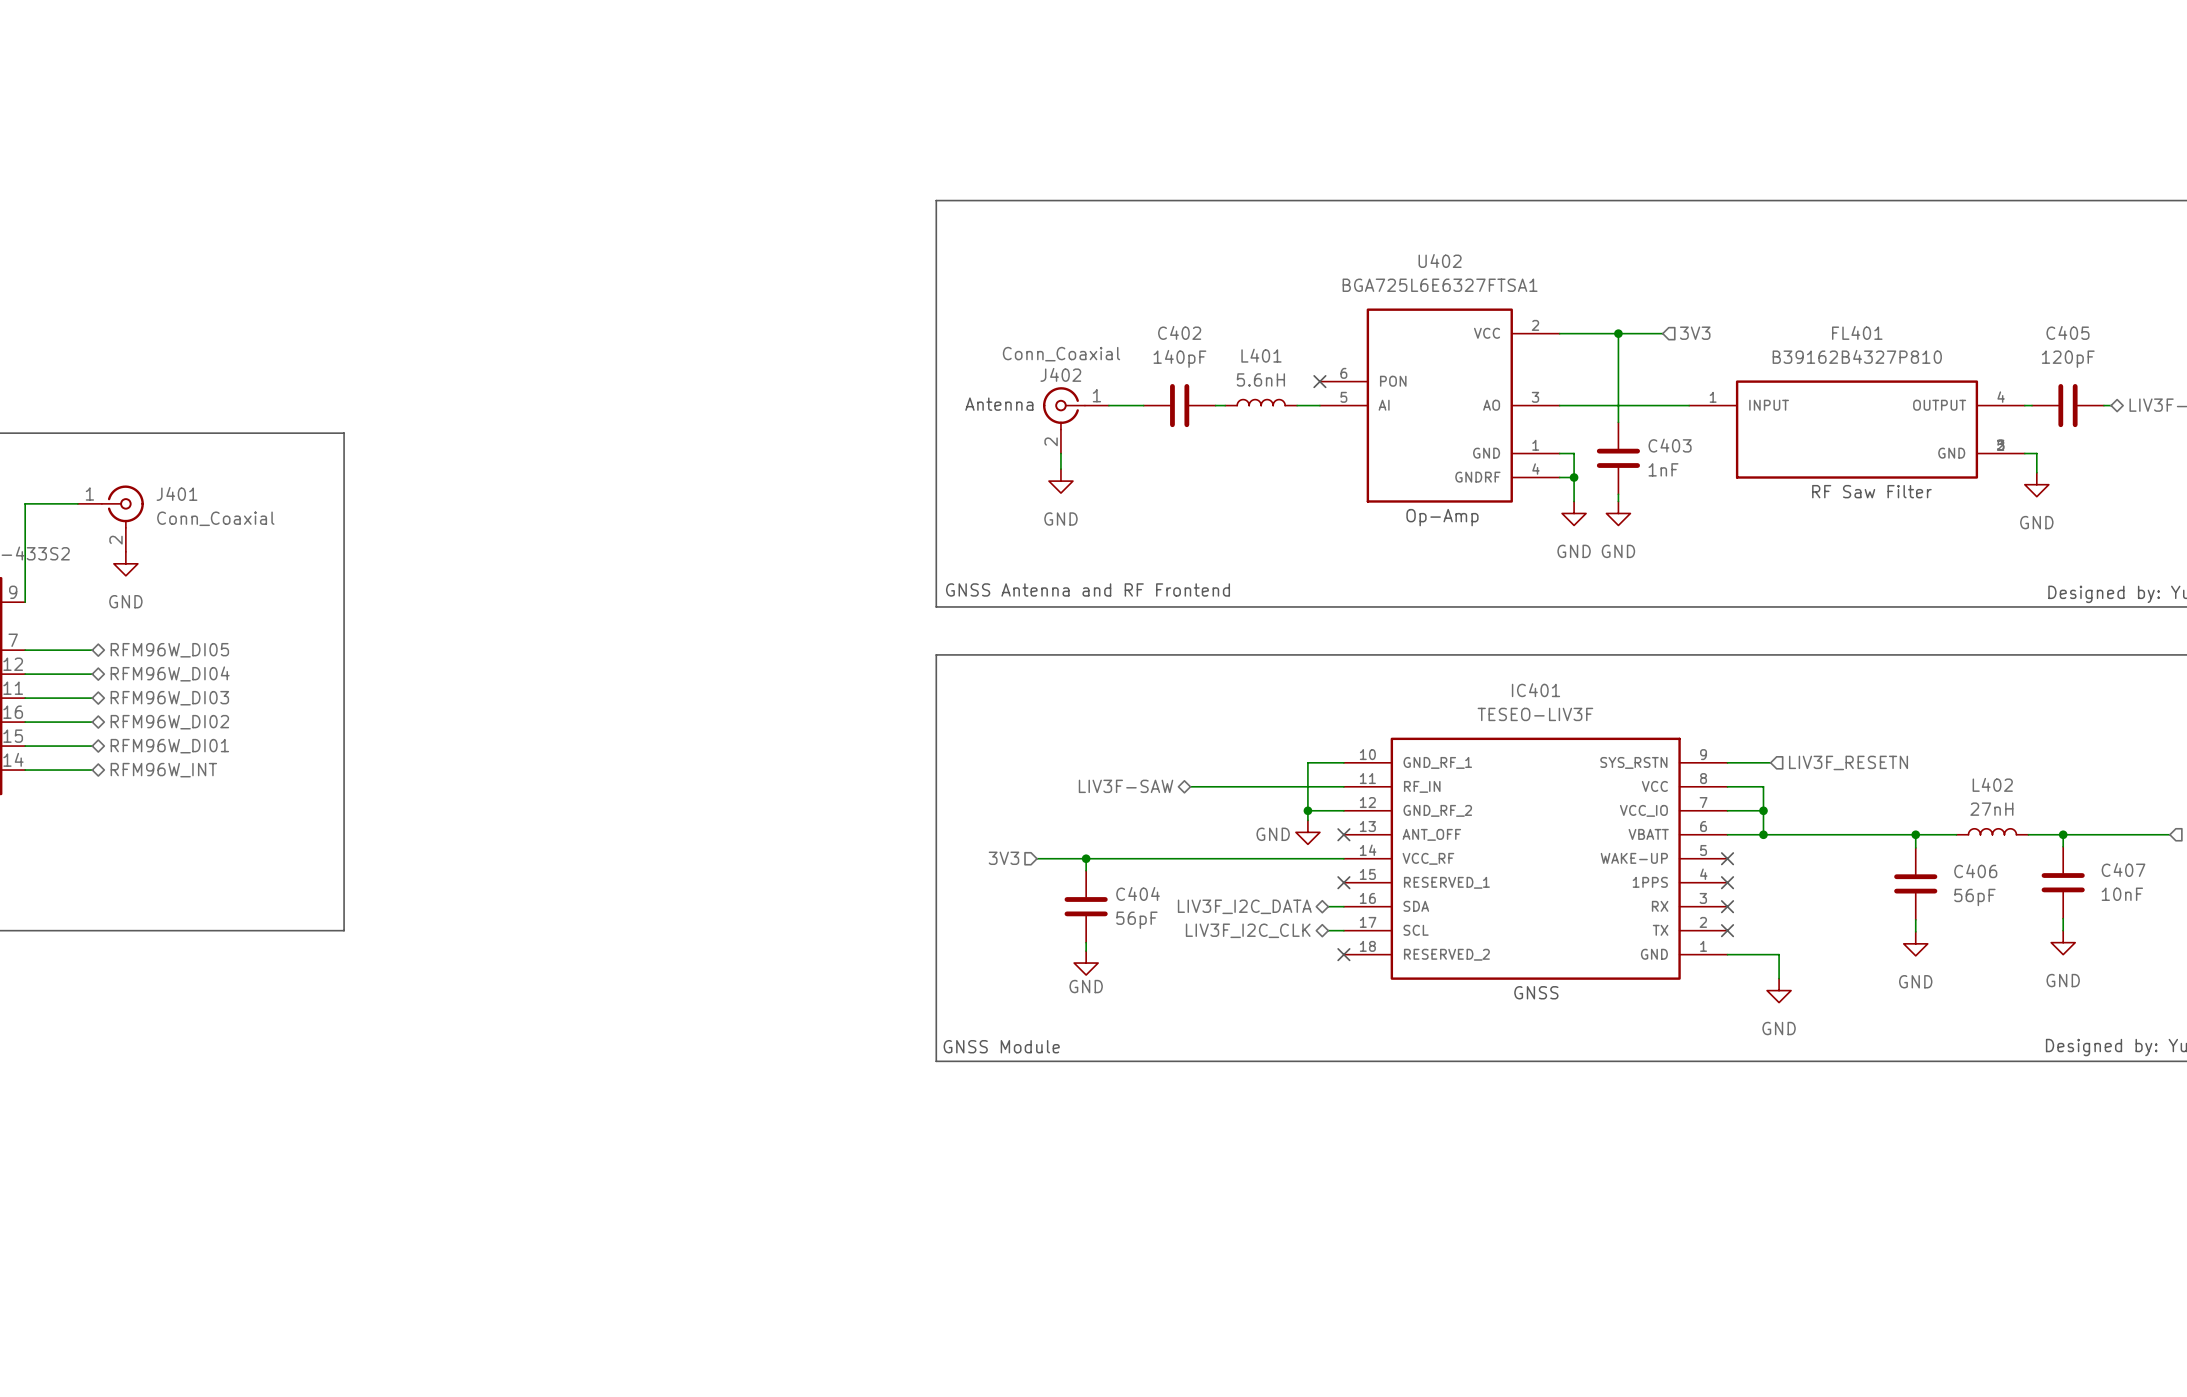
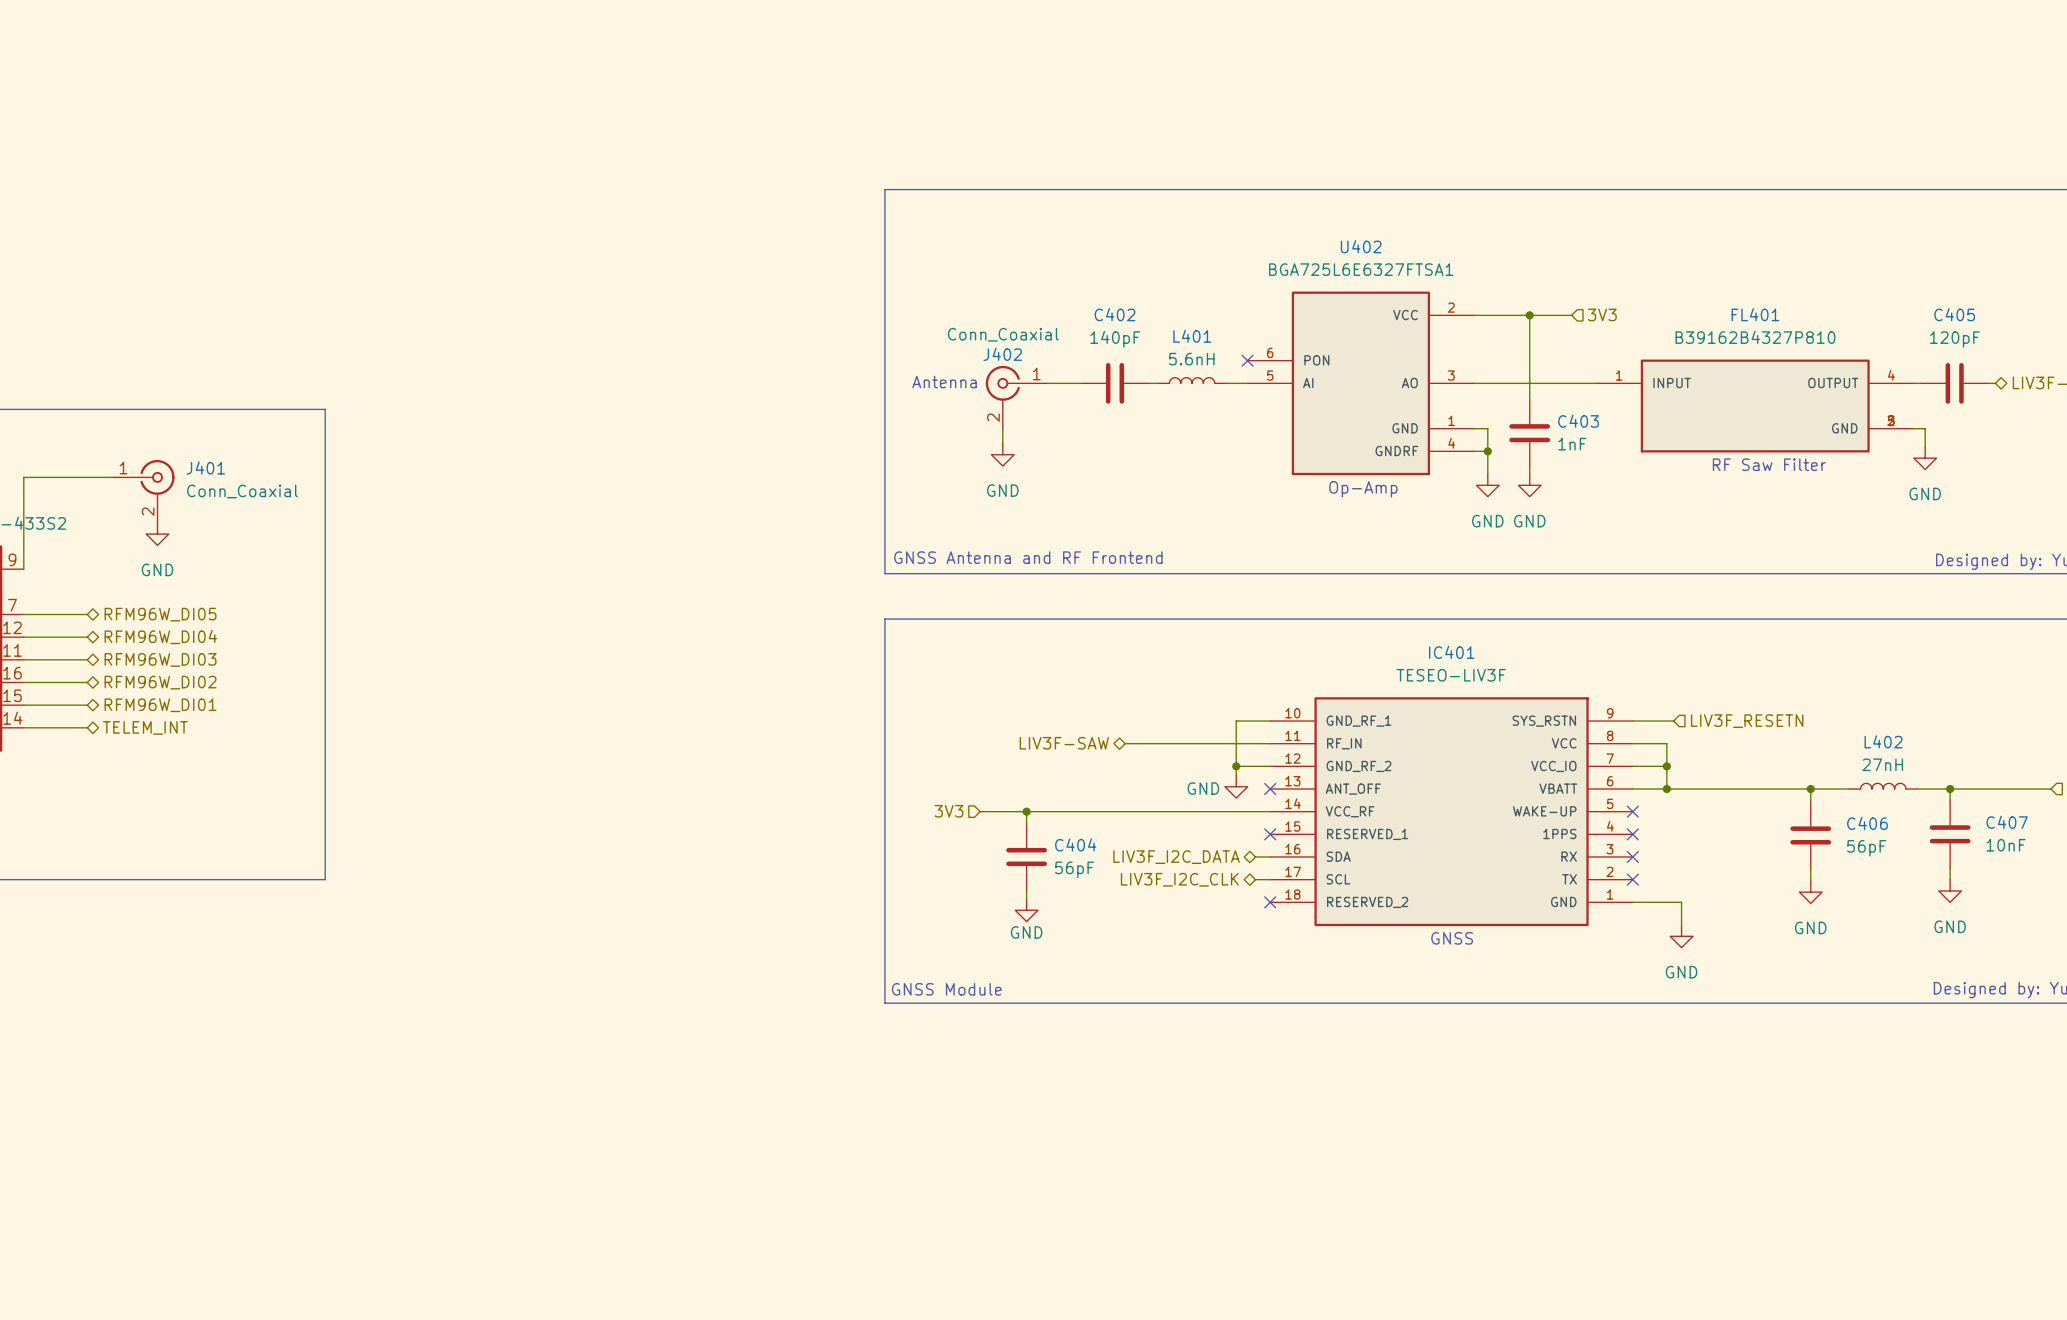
wire: (77, 503) (25, 505) -> (112, 477) (23, 477)
J401 position: (110, 518) -> (143, 491)
power symbol position: GND (125, 563) -> GND (157, 534)
hierarchical label: RFM96W_INT (163, 770) -> TELEM_INT (145, 727)

